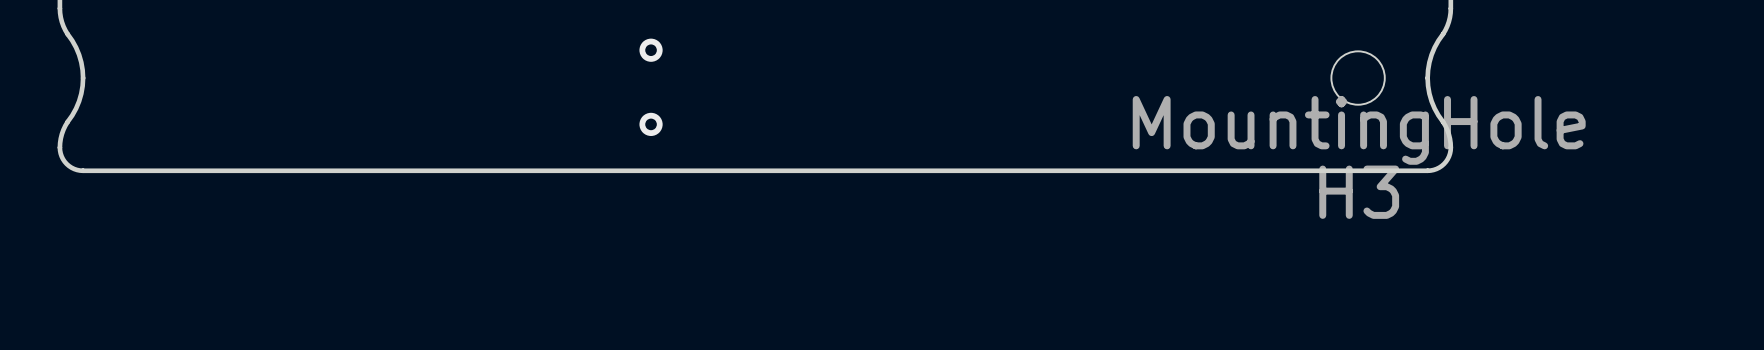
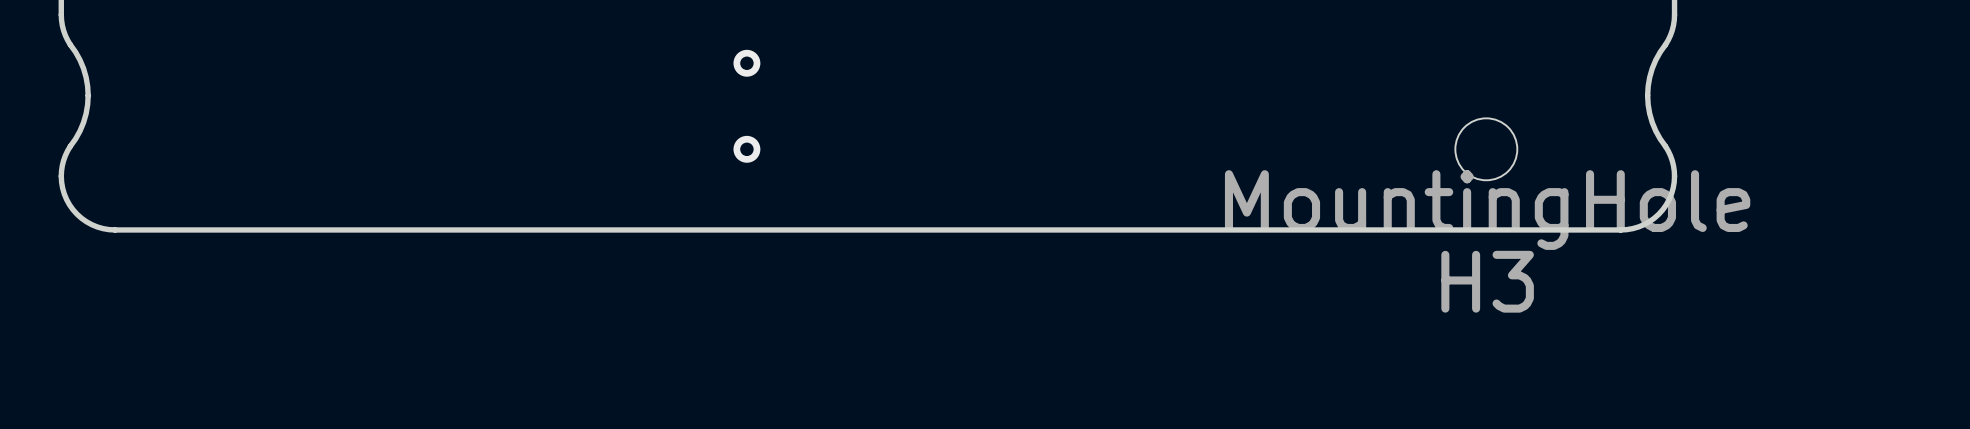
H3 position: (1358, 78) -> (1486, 149)
board edge: (59, 147) (61, 156) (66, 163) (74, 169) (83, 170) (1427, 170) (1436, 169) (1444, 163) (1449, 156) (1450, 147) -> (61, 176) (64, 193) (77, 214) (97, 226) (115, 229) (1620, 229) (1638, 226) (1658, 214) (1671, 193) (1674, 176)

